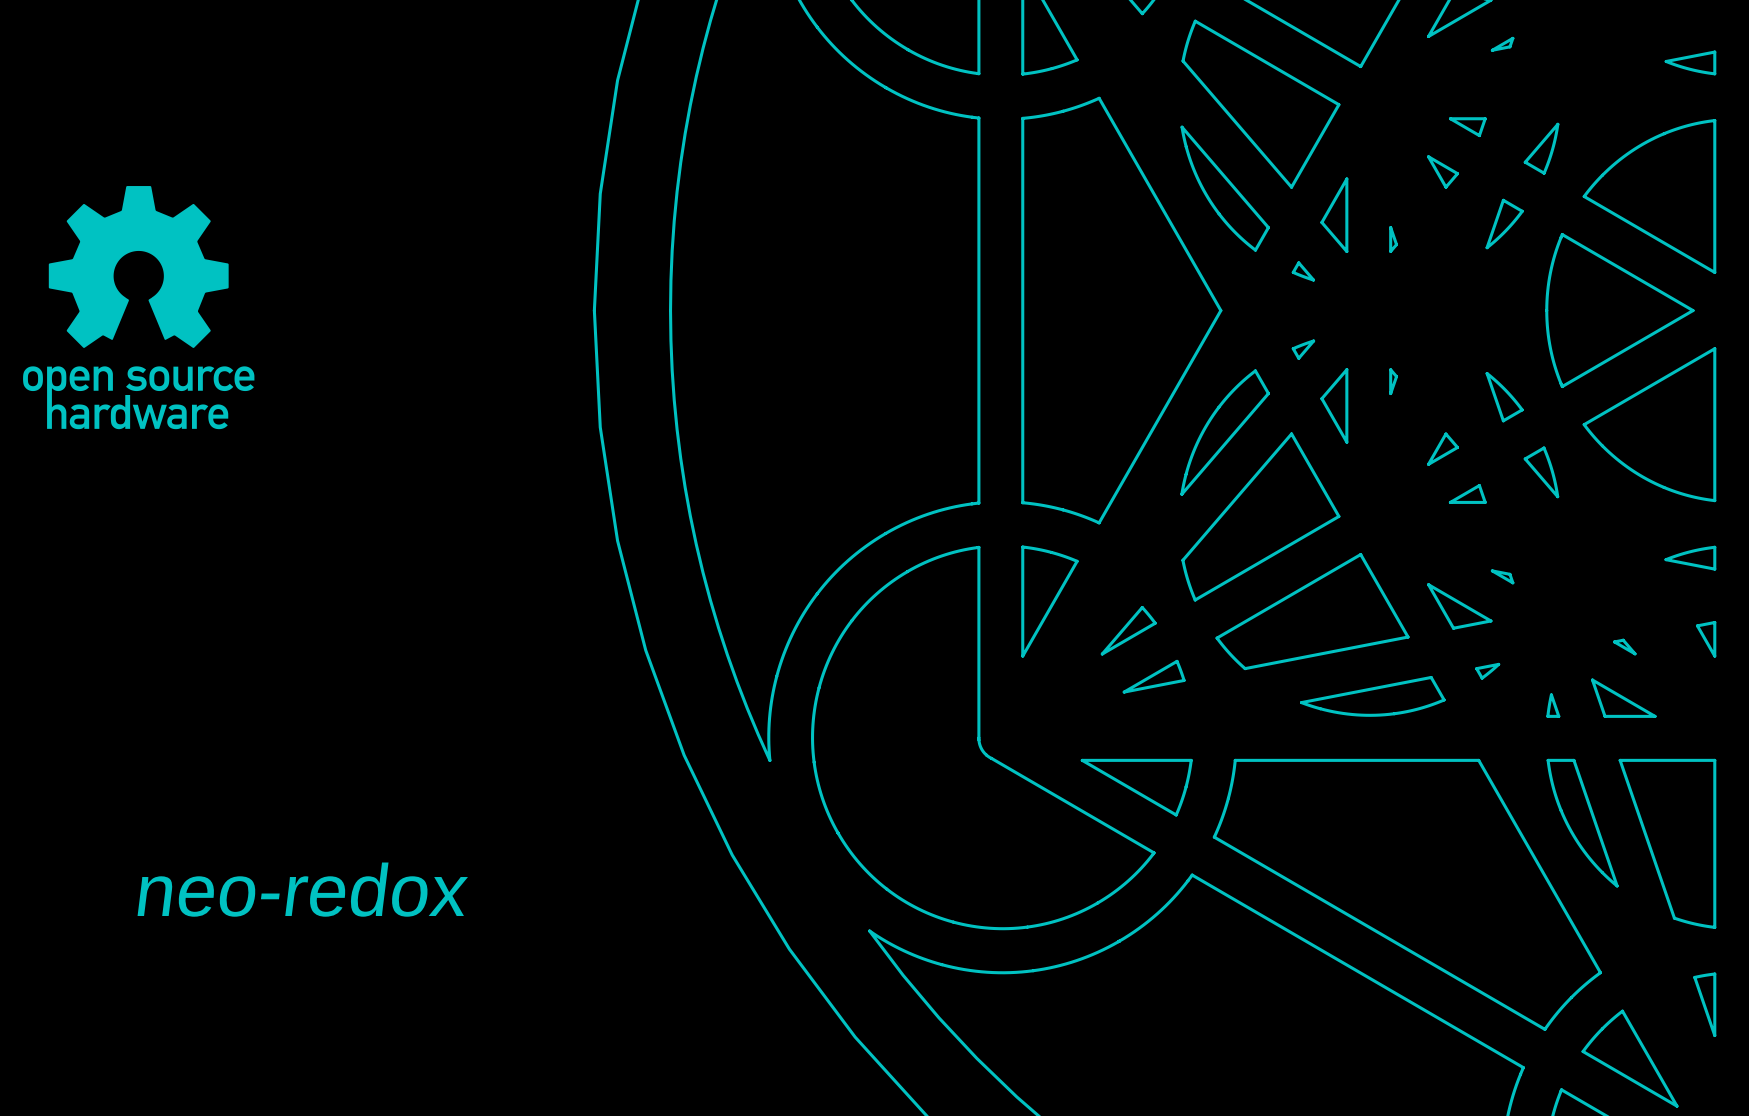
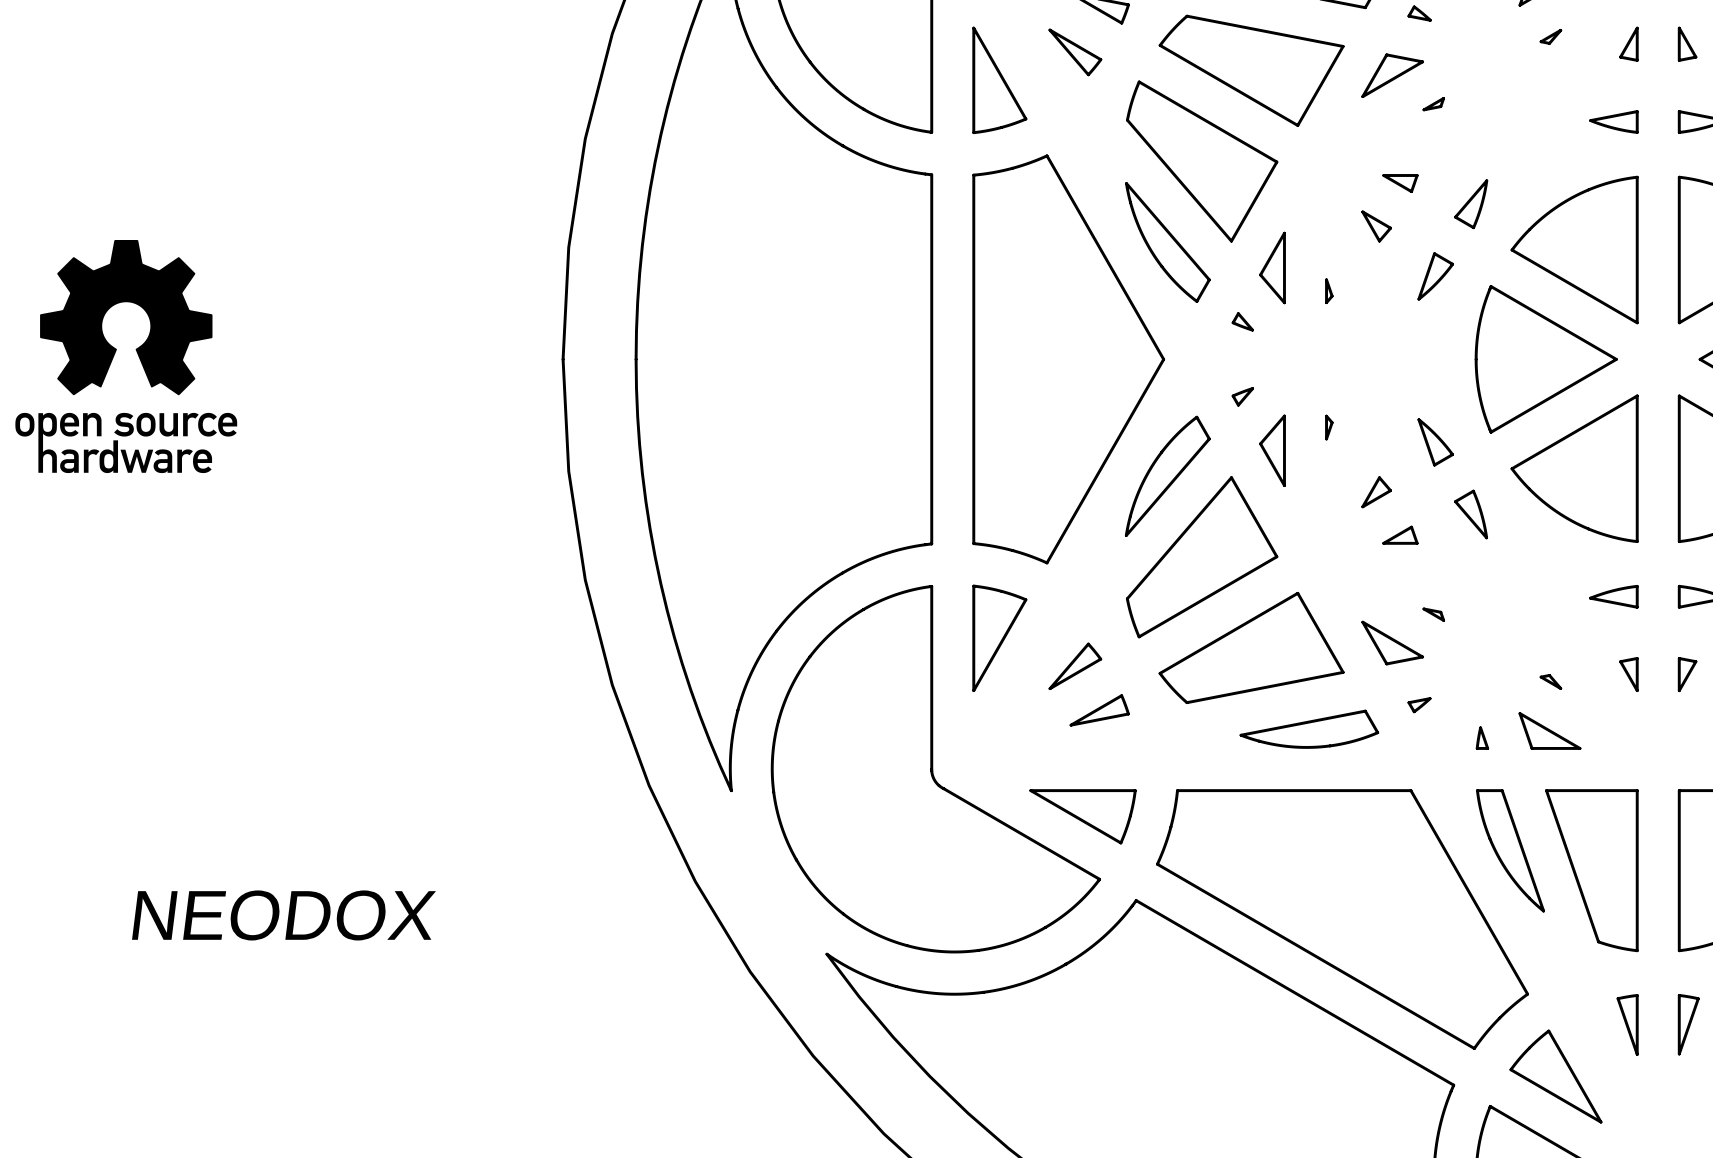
text: neo-redox (302, 889) -> NEODOX (284, 915)

